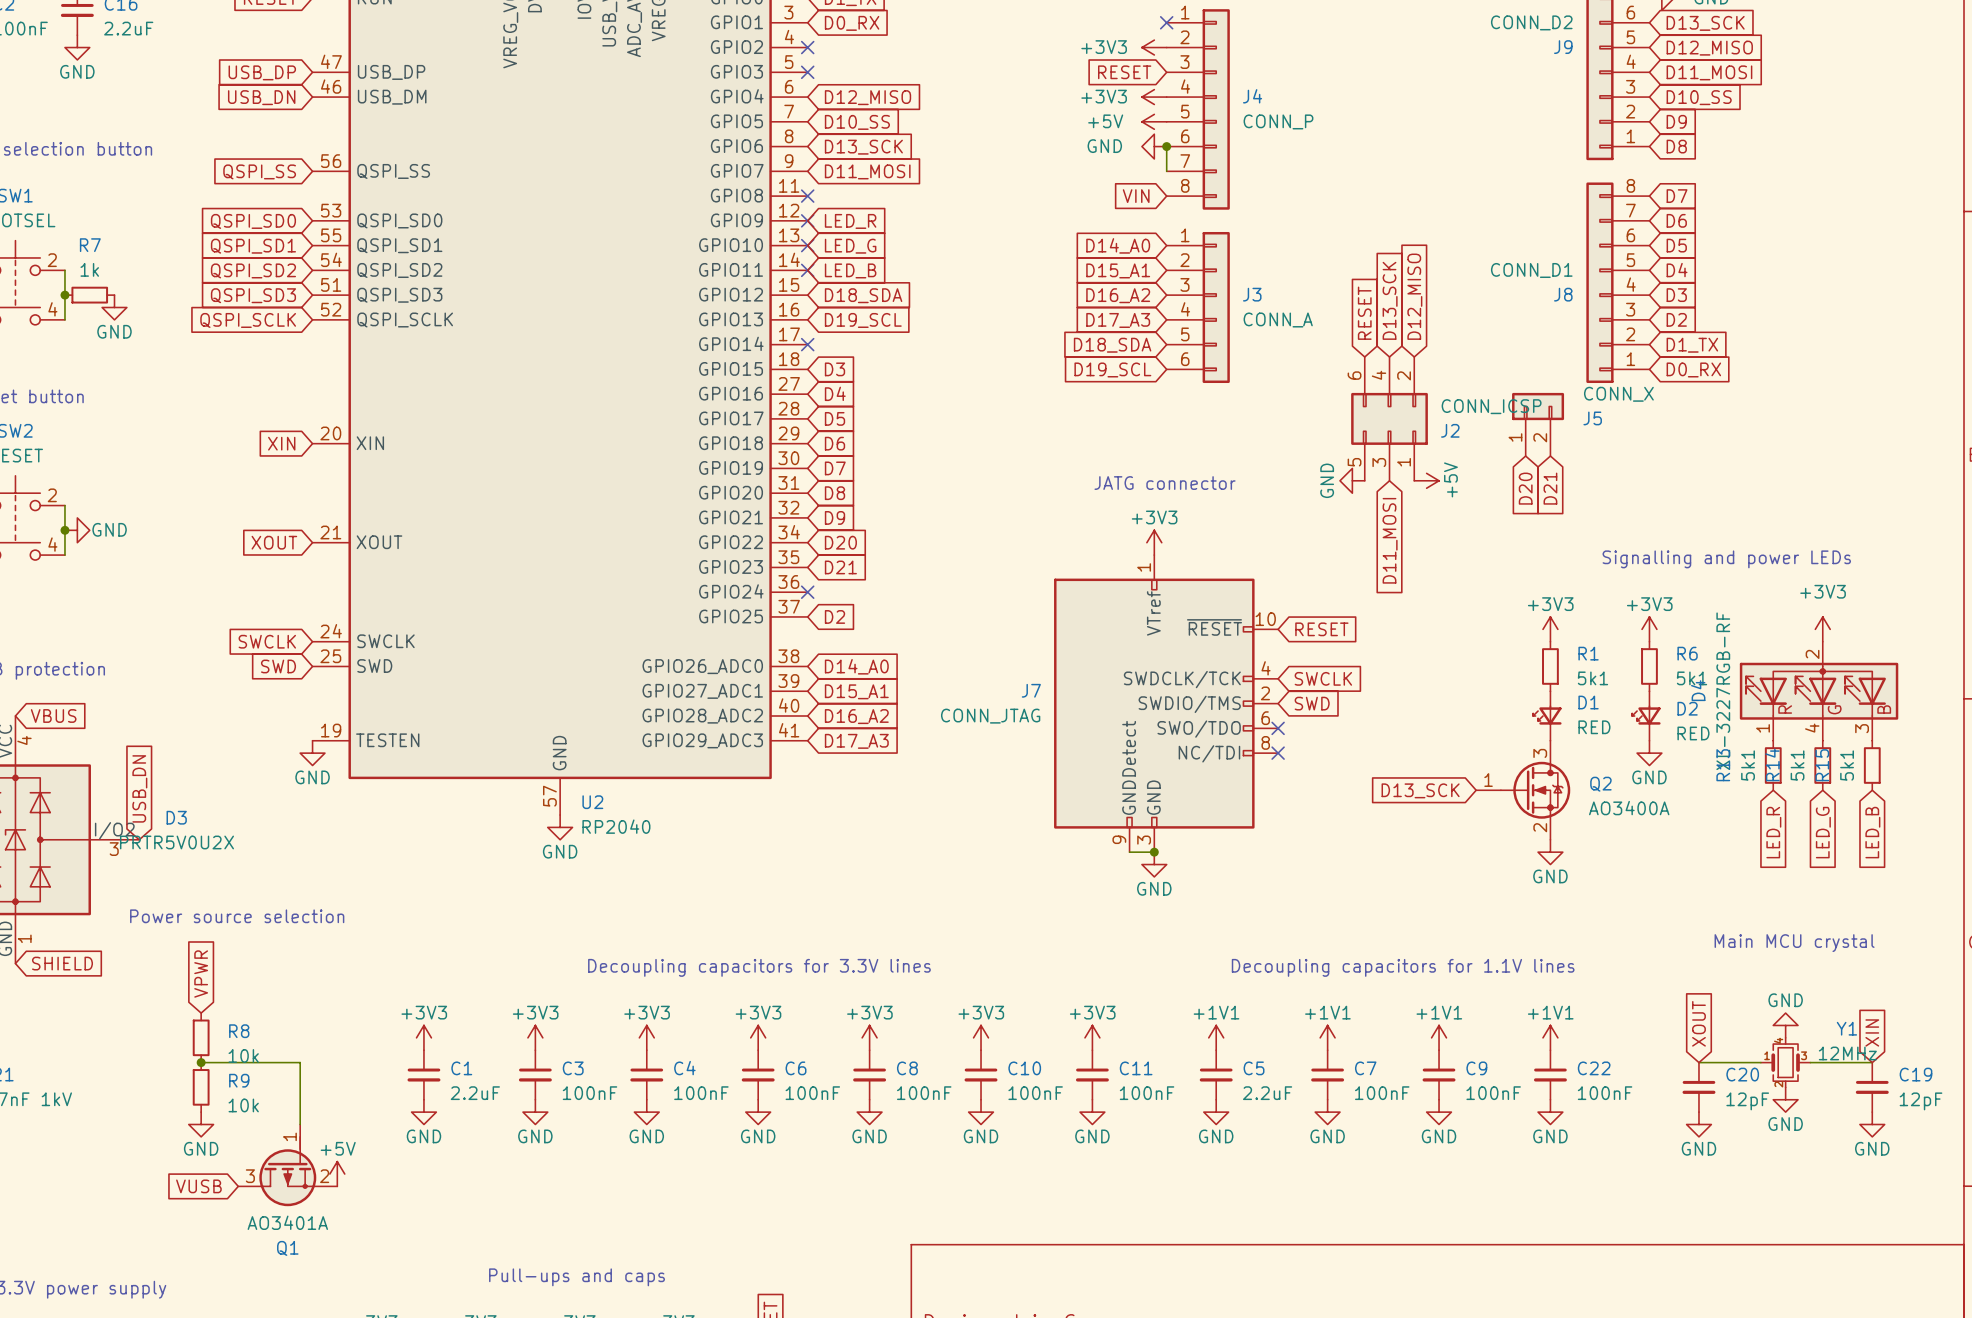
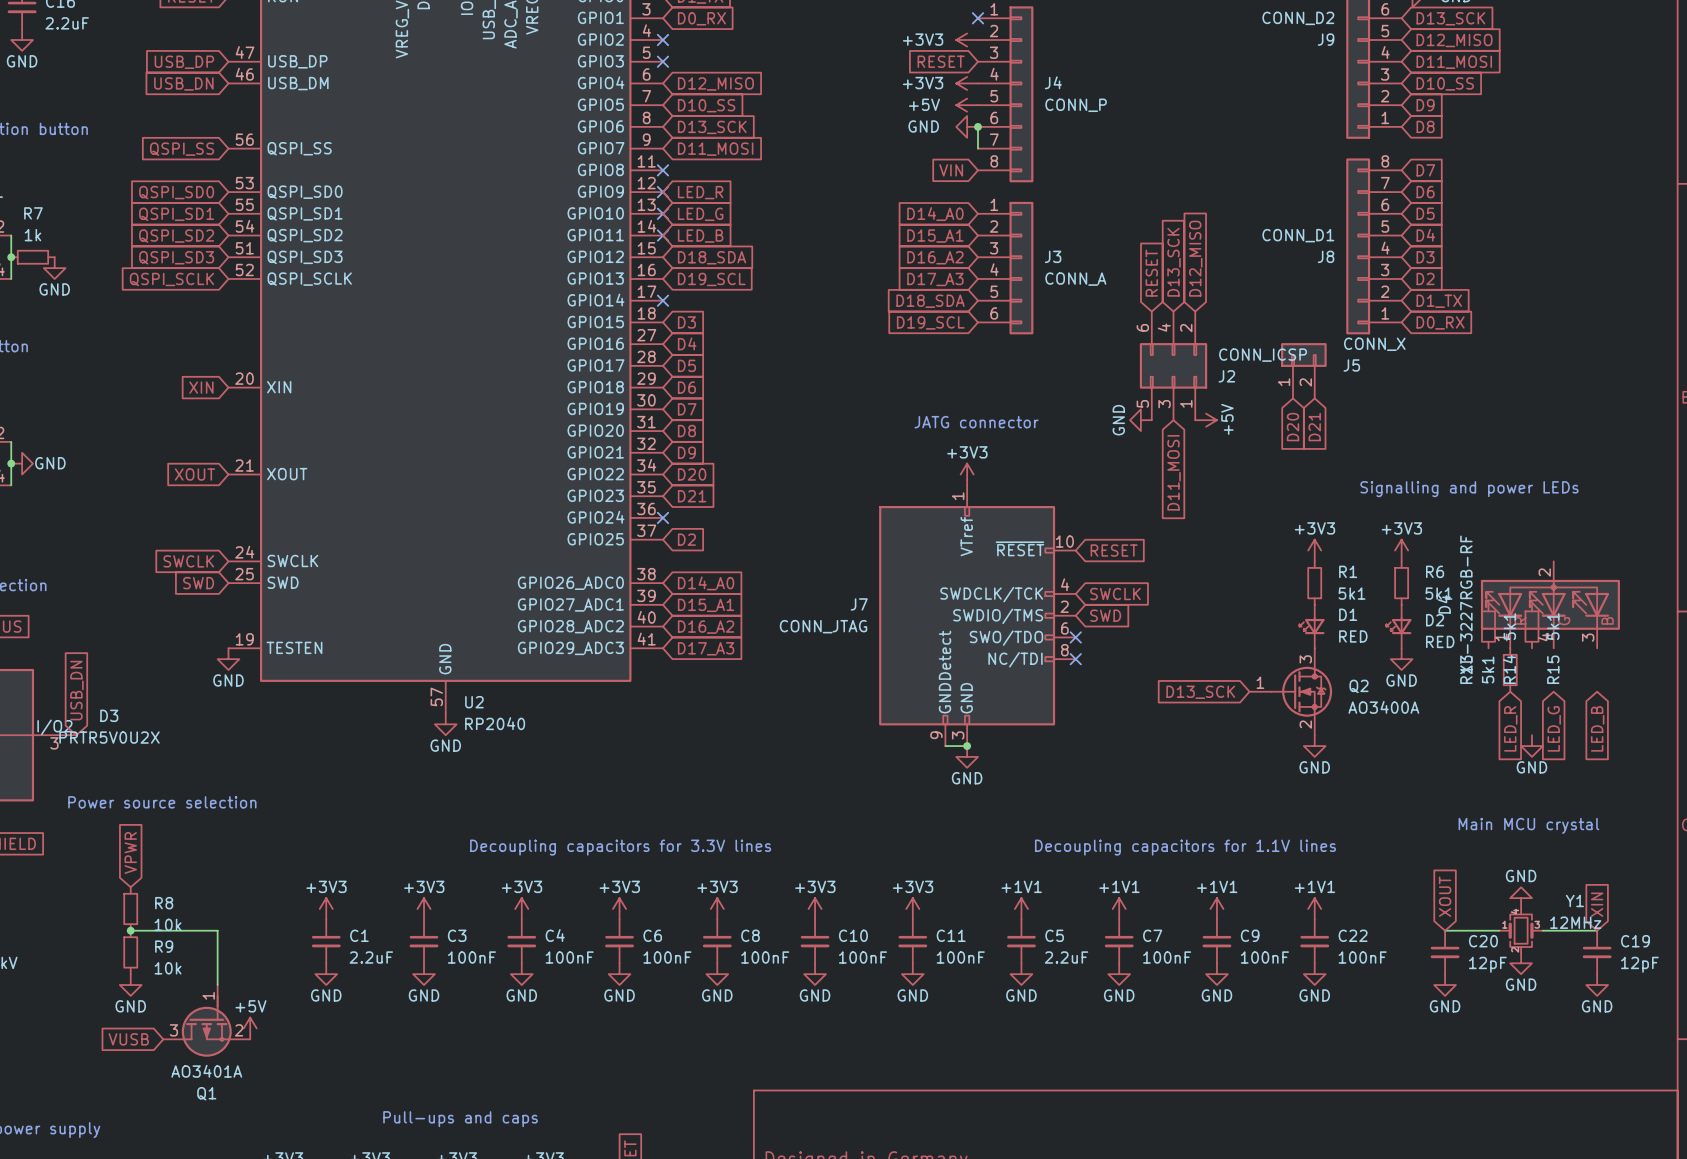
power symbol: +3V3 (1822, 629) -> none
R14 value position: 5k1 (1797, 765) -> 5k1 (1553, 626)
R14 position: (1822, 765) -> (1531, 626)
R15 value position: 5k1 (1847, 765) -> 5k1 (1509, 626)
R15 position: (1872, 765) -> (1488, 626)
power symbol: none -> GND (1531, 746)

